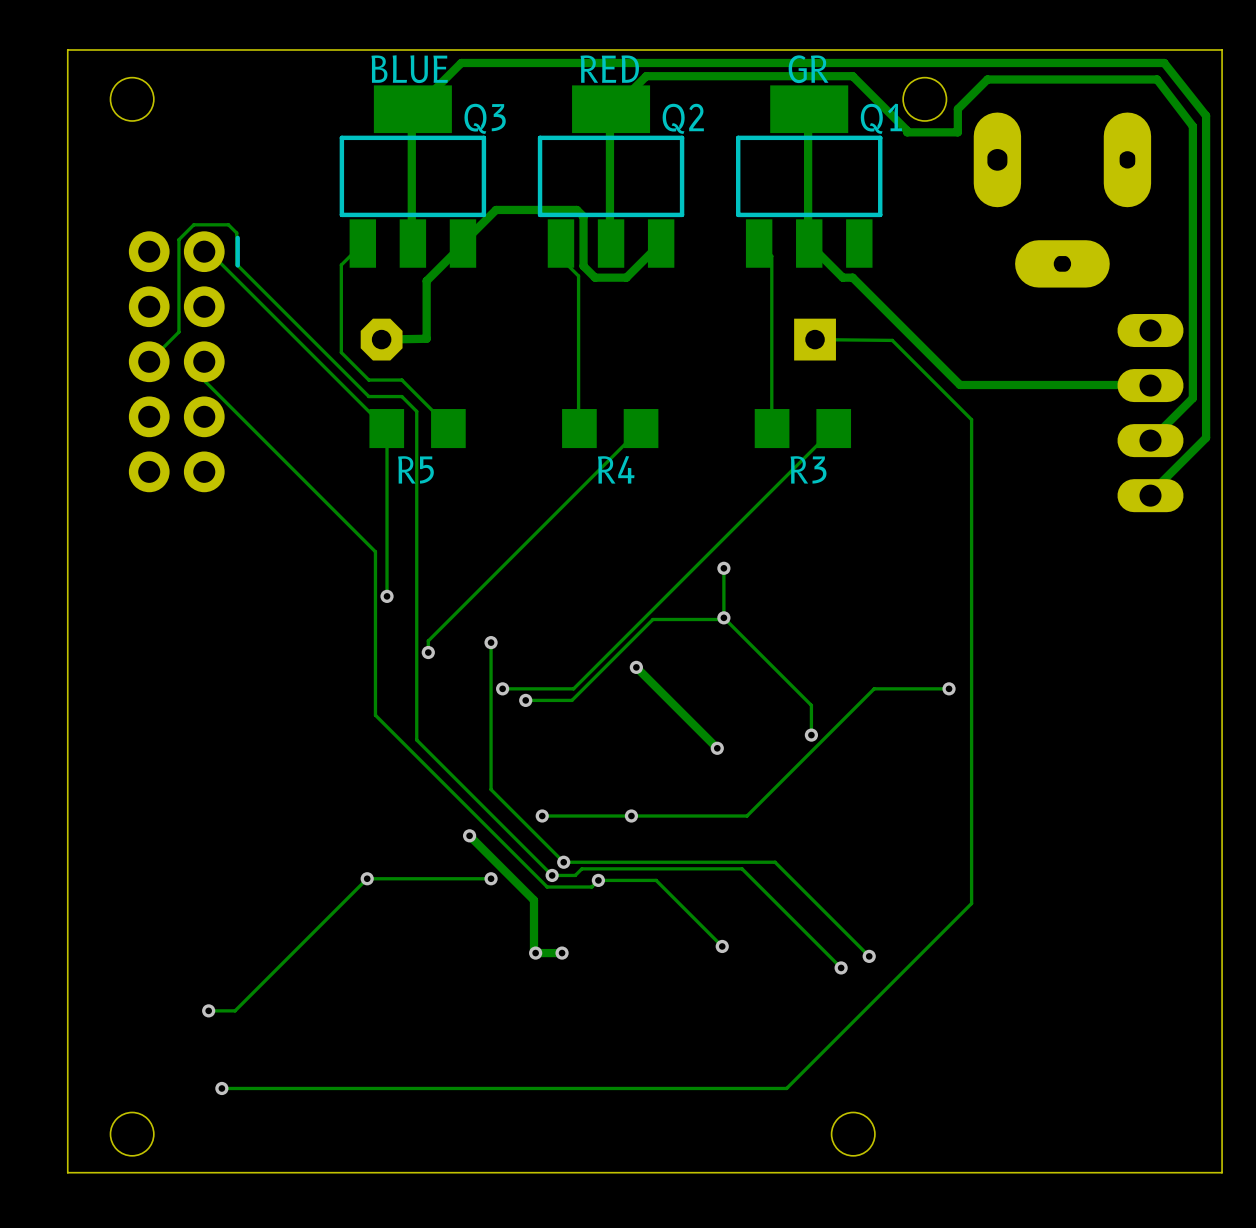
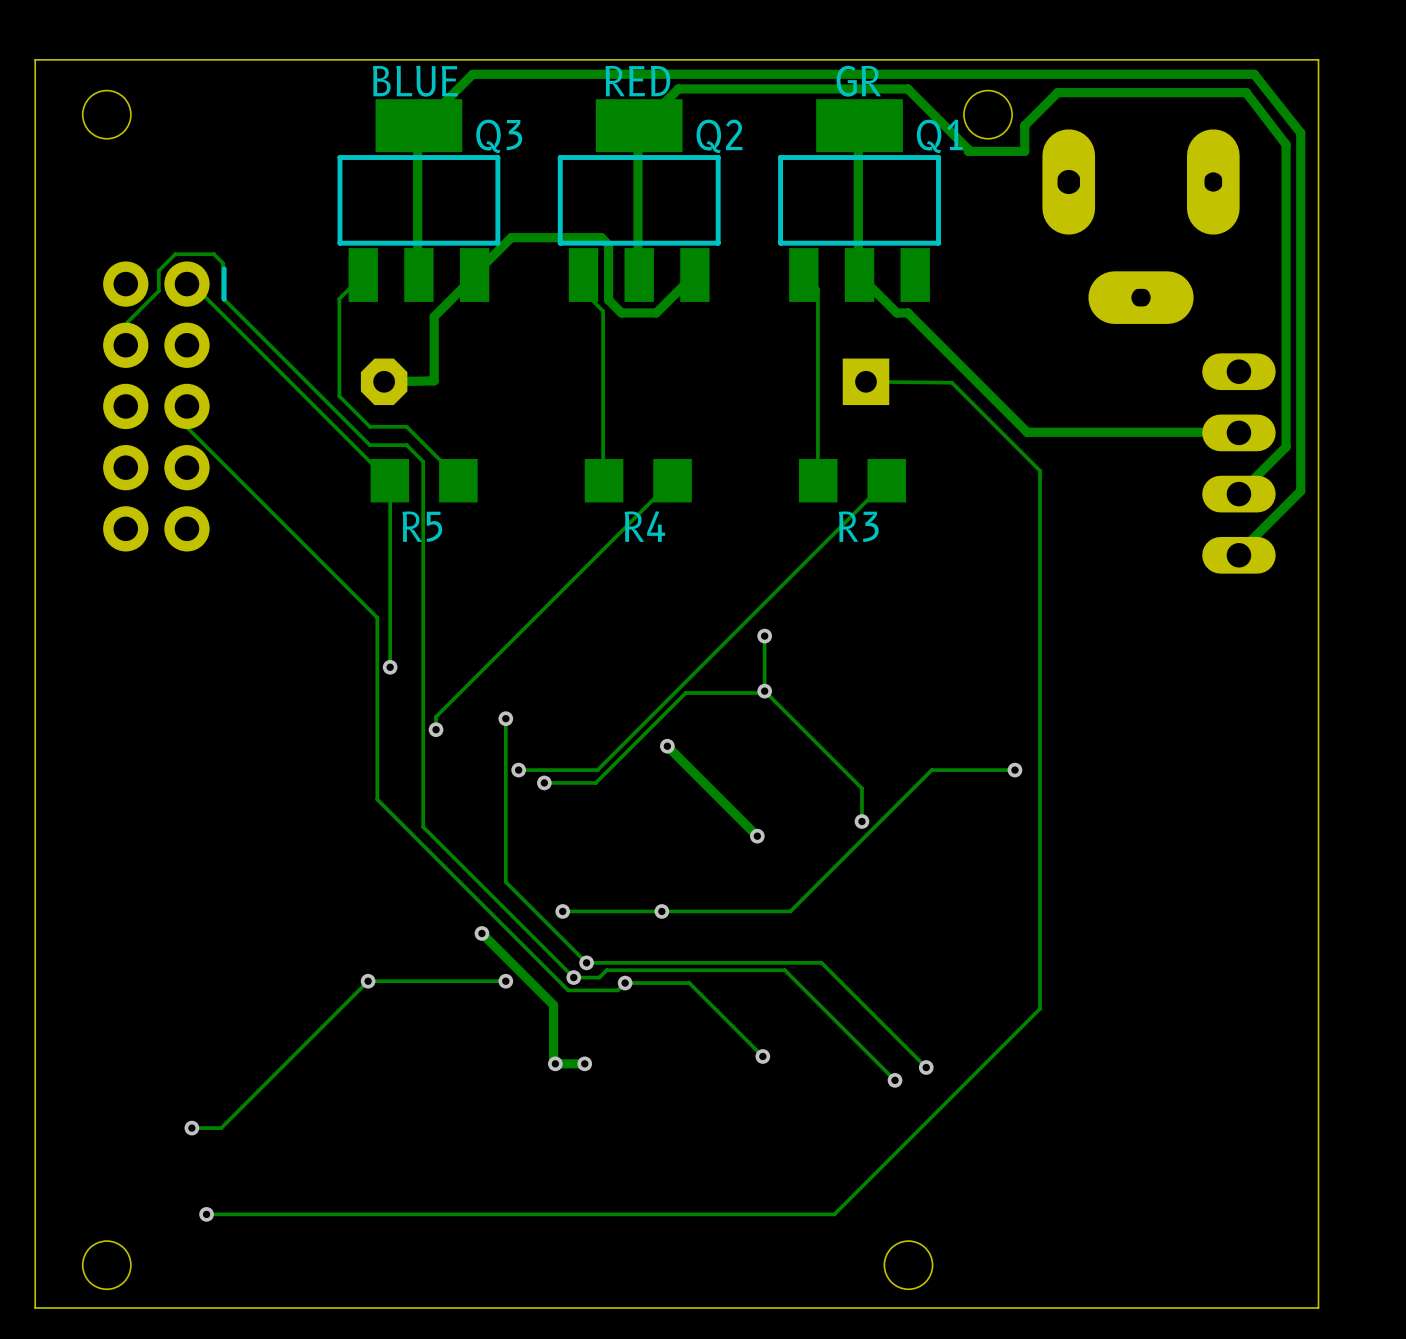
track: (178, 257) (178, 332) (149, 361) -> (158, 290) (127, 322) (127, 344) (125, 345)

